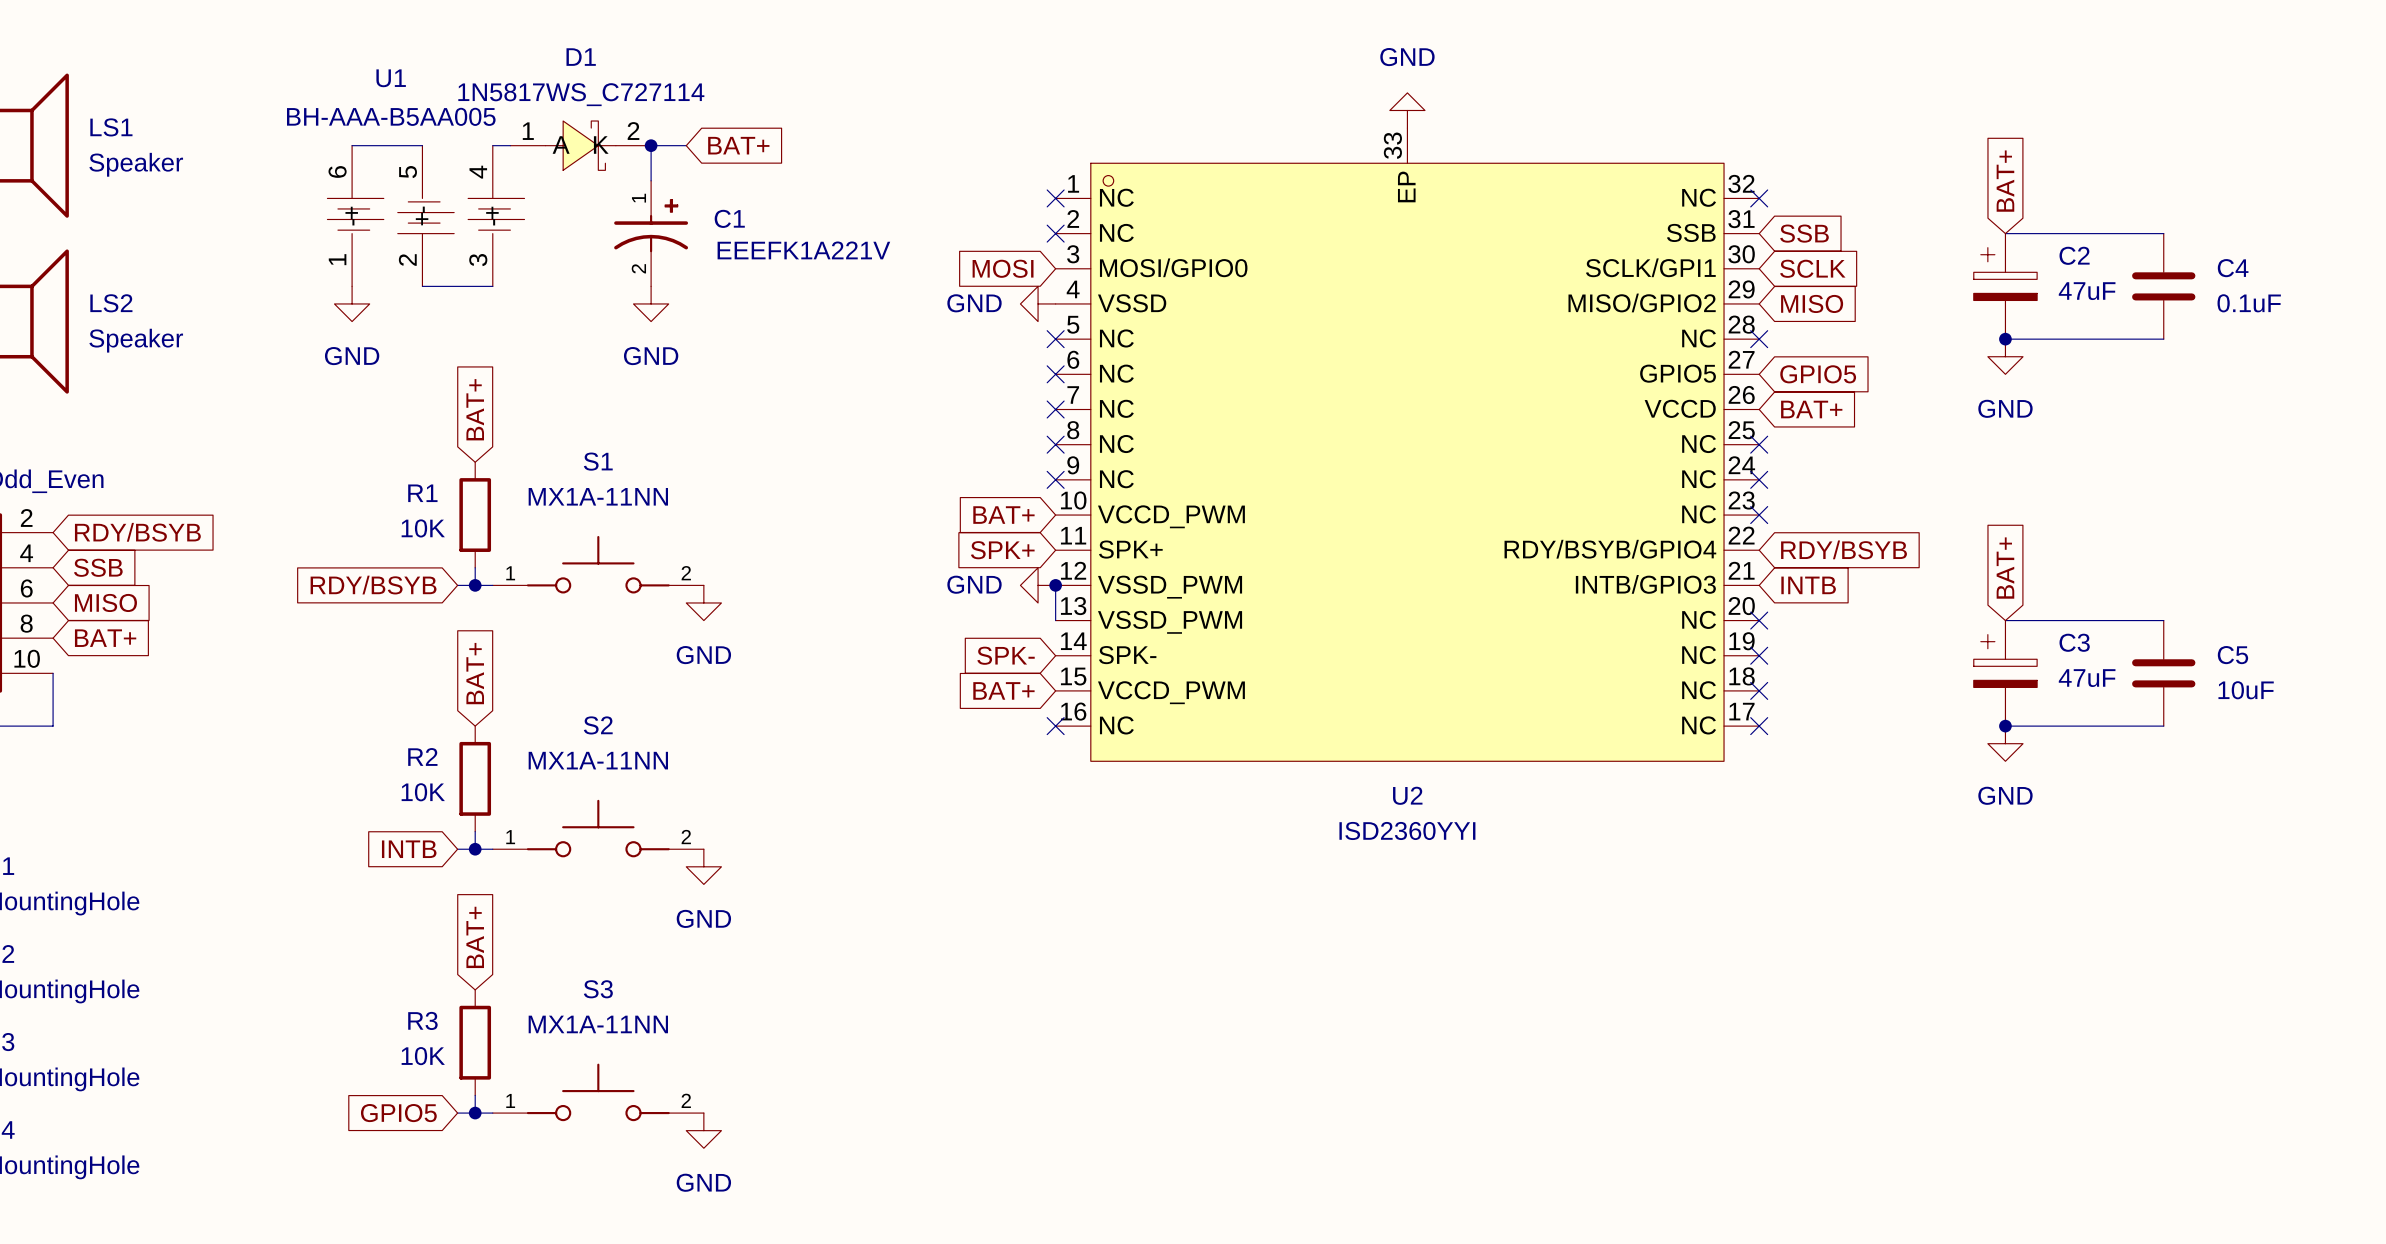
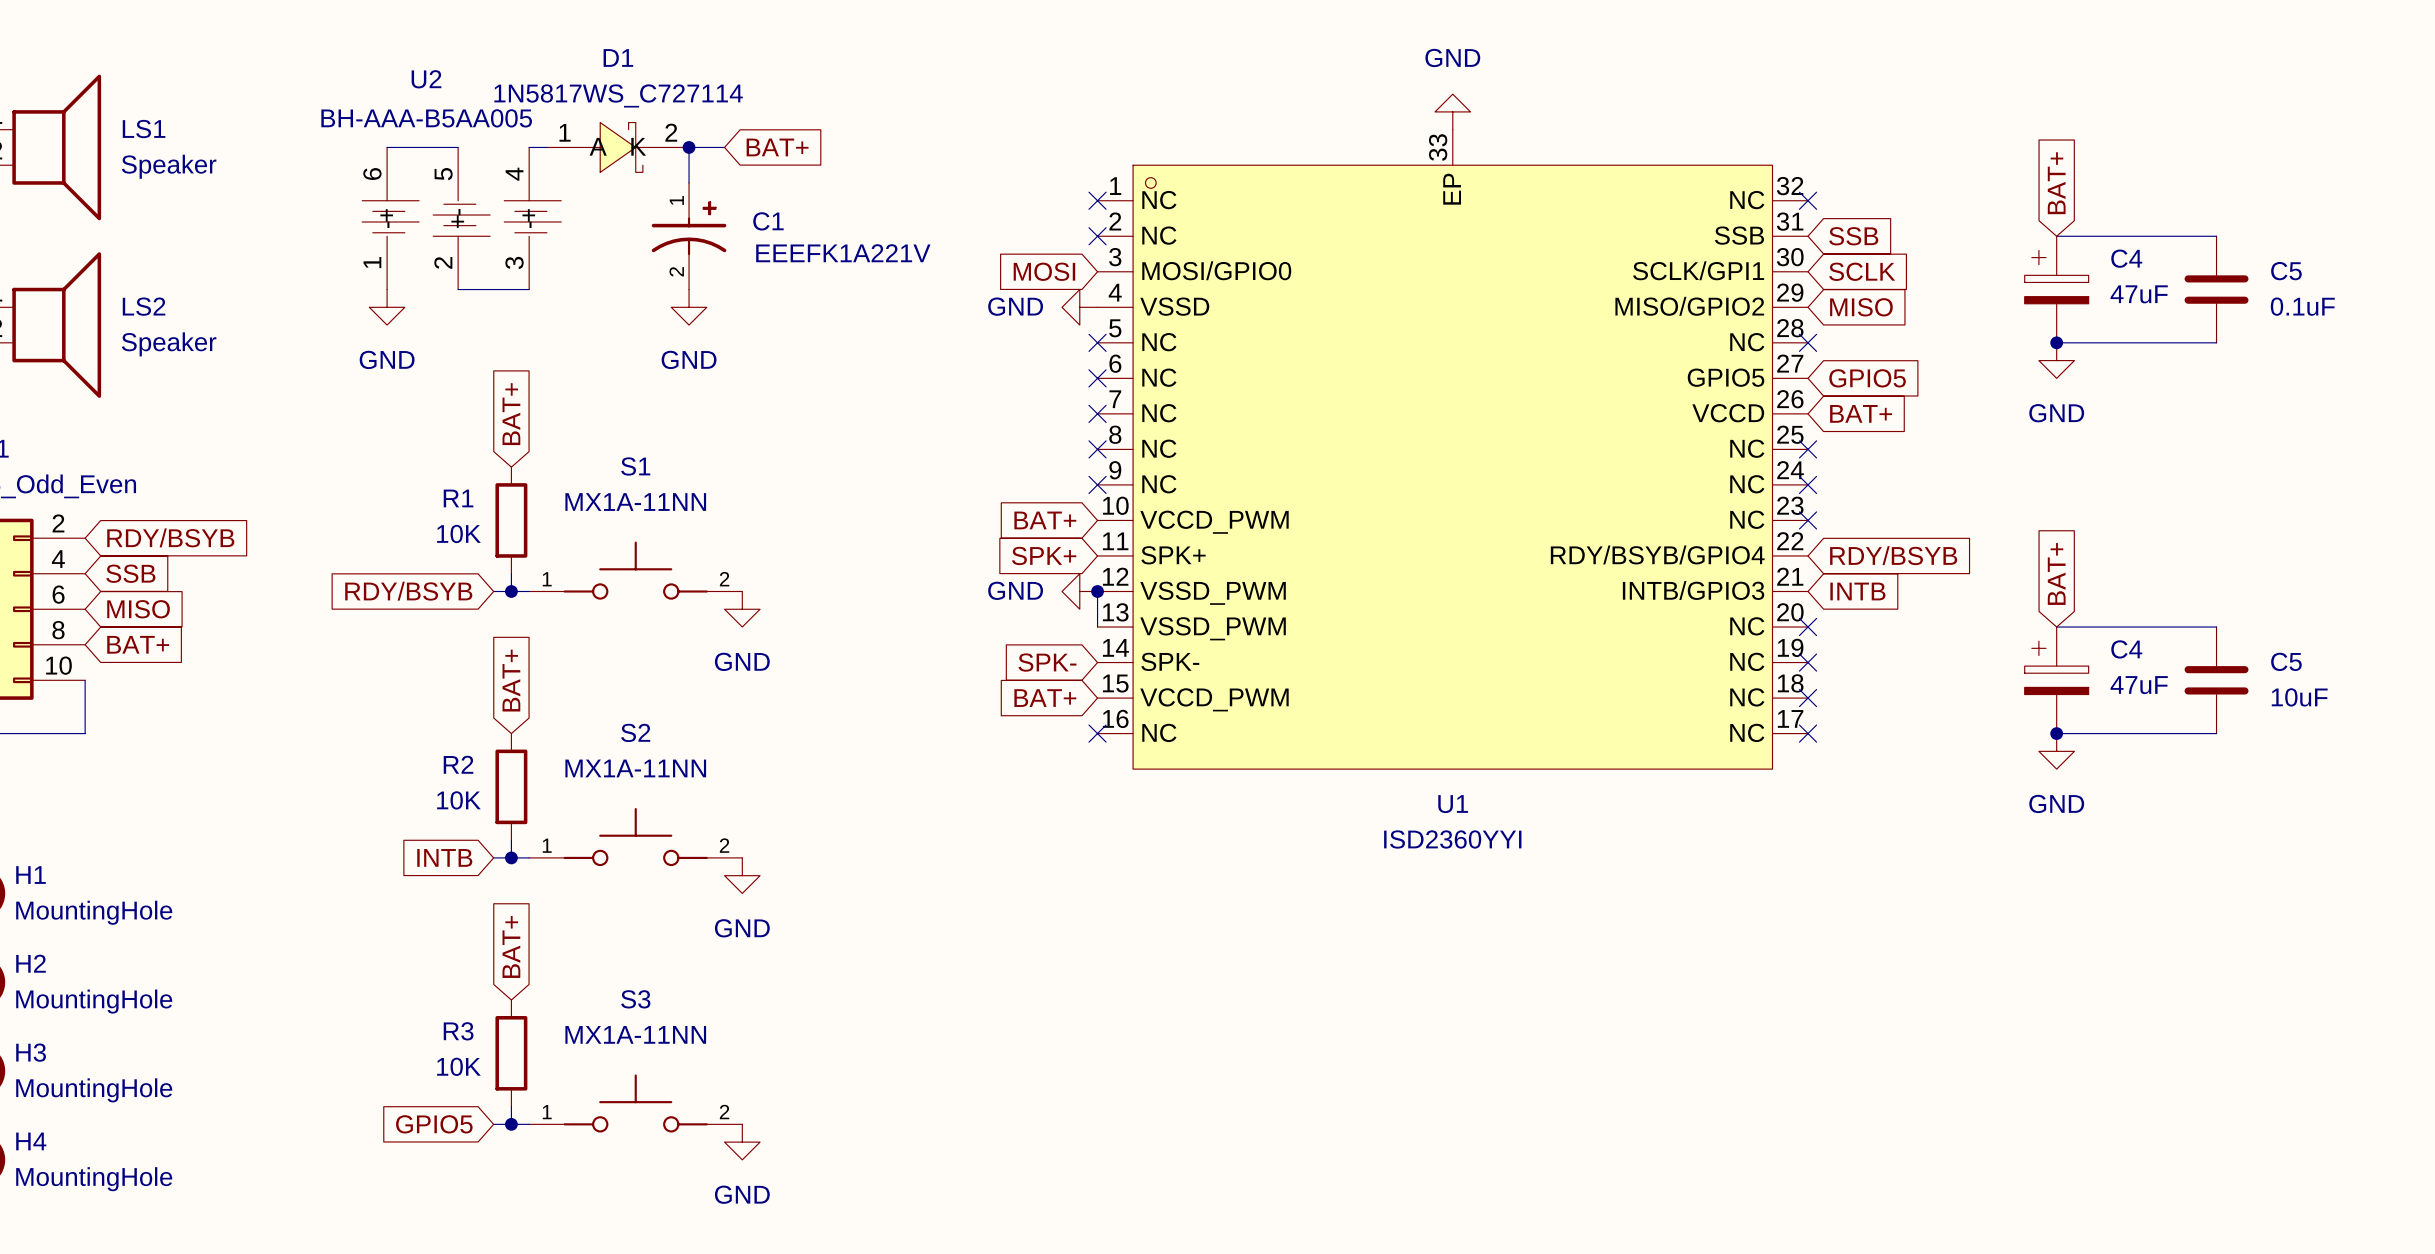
U1 name: U1 (391, 78) -> U2 (426, 79)
C2 name: C2 (2074, 255) -> C4 (2126, 258)
C4 name: C4 (2233, 268) -> C5 (2286, 271)
C3 name: C3 (2074, 642) -> C4 (2126, 649)
U2 name: U2 (1407, 795) -> U1 (1453, 804)

